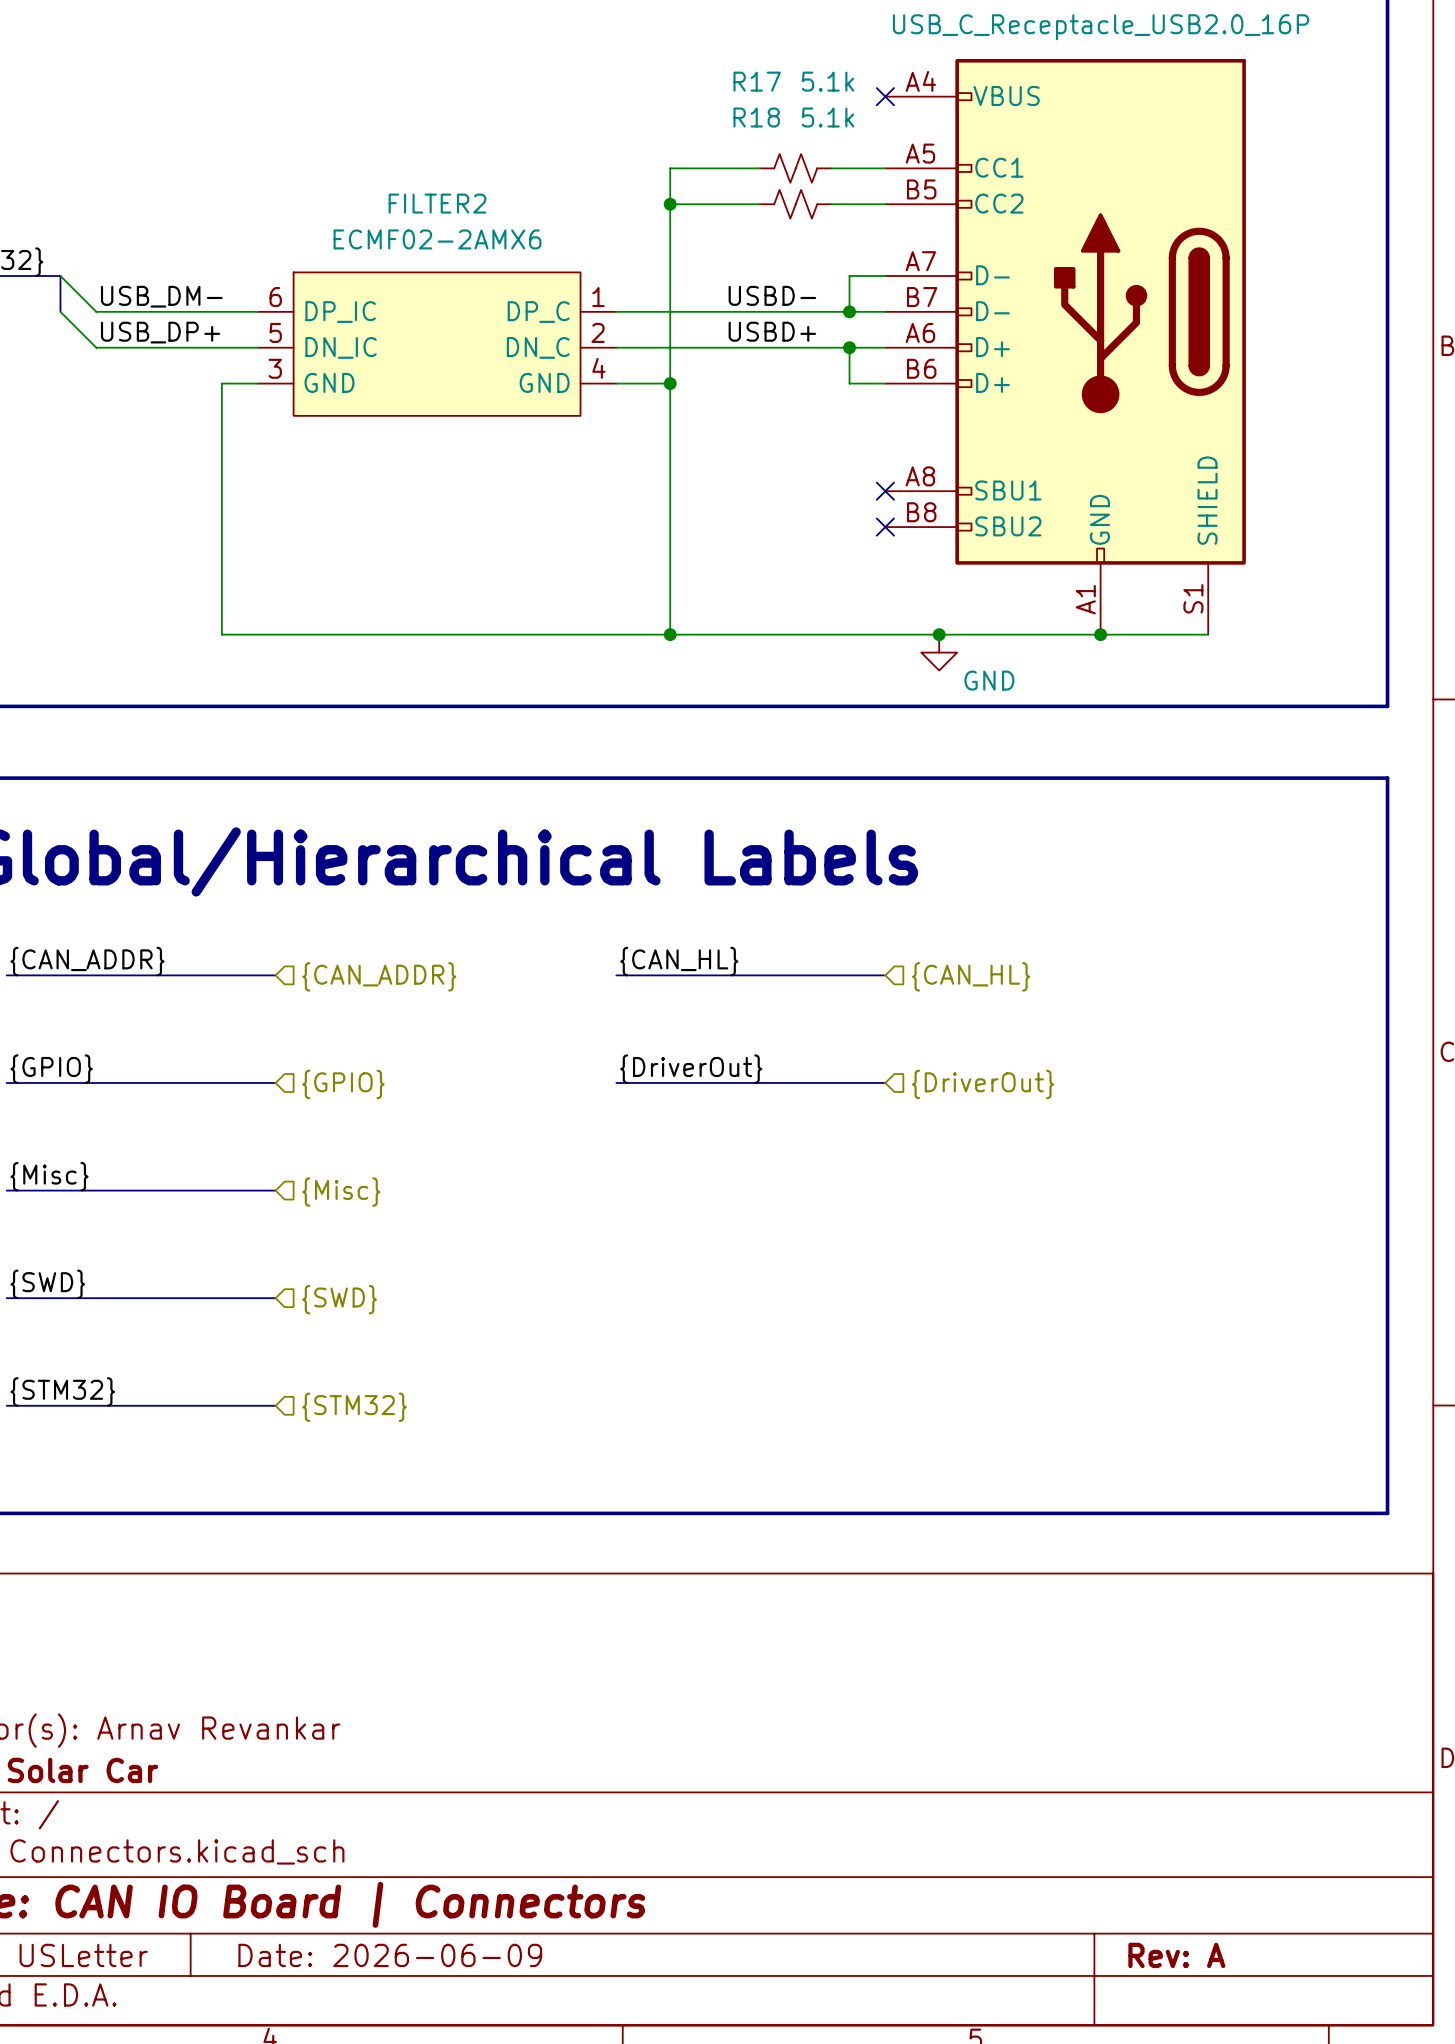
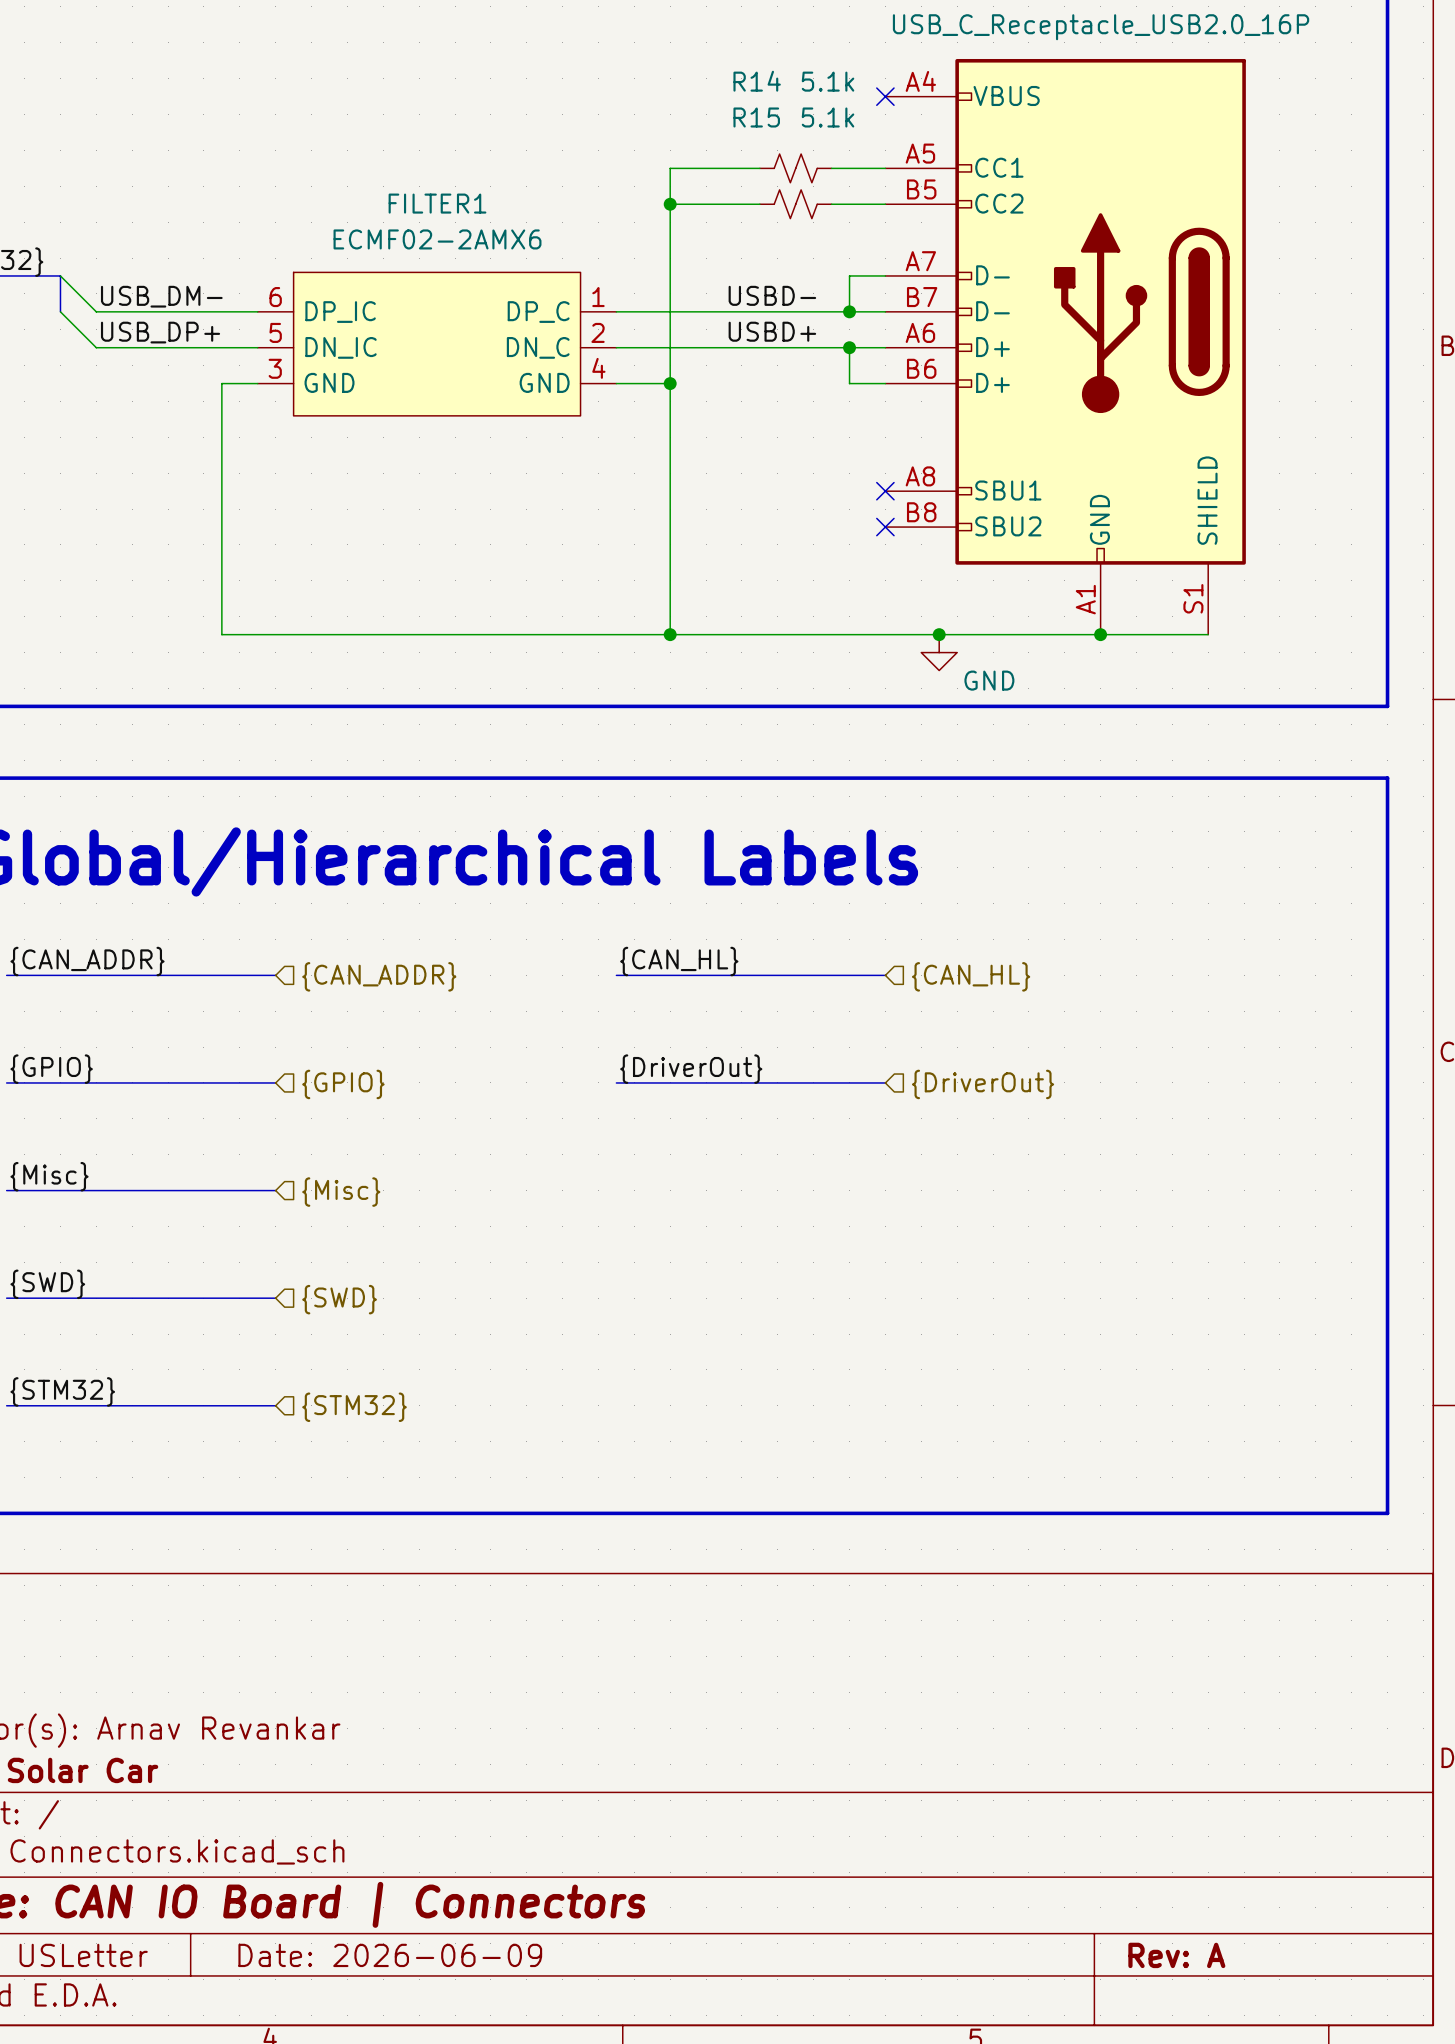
R17 name: R17 (757, 81) -> R14 (757, 81)
R18 name: R18 (756, 117) -> R15 (756, 117)
FILTER2 name: FILTER2 (437, 203) -> FILTER1 (437, 203)

